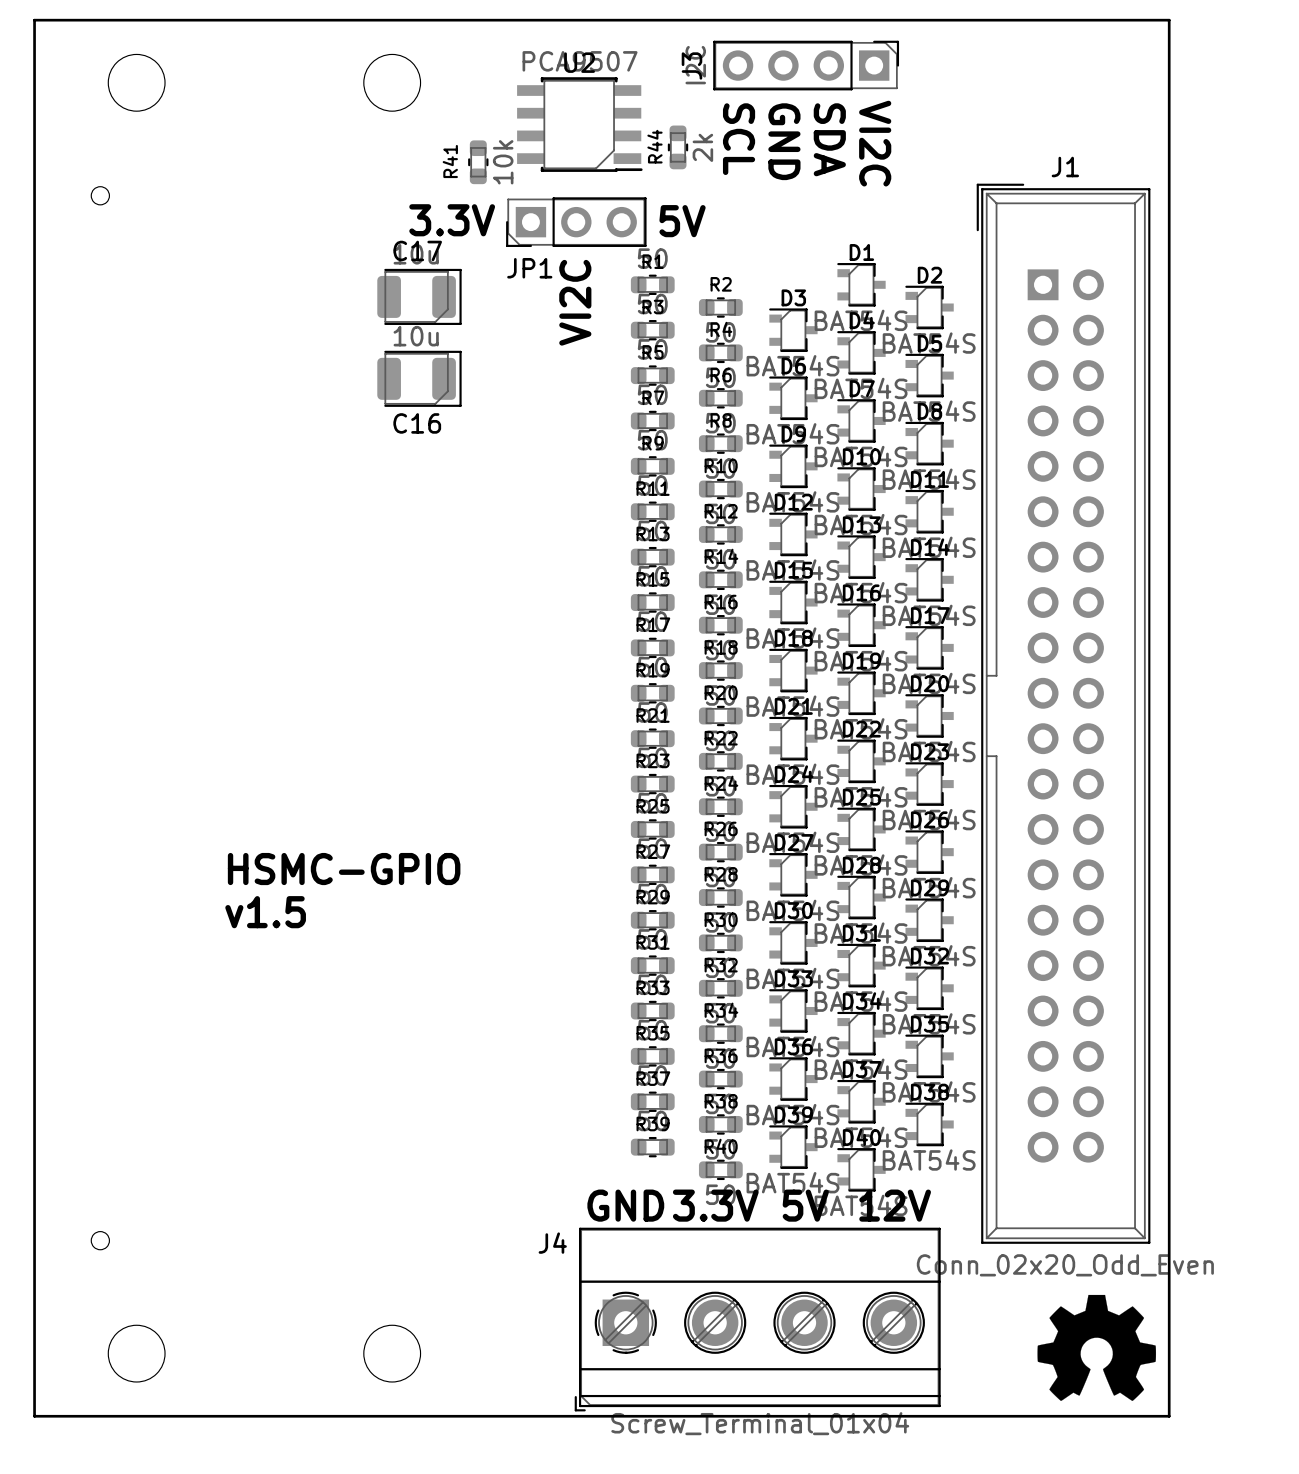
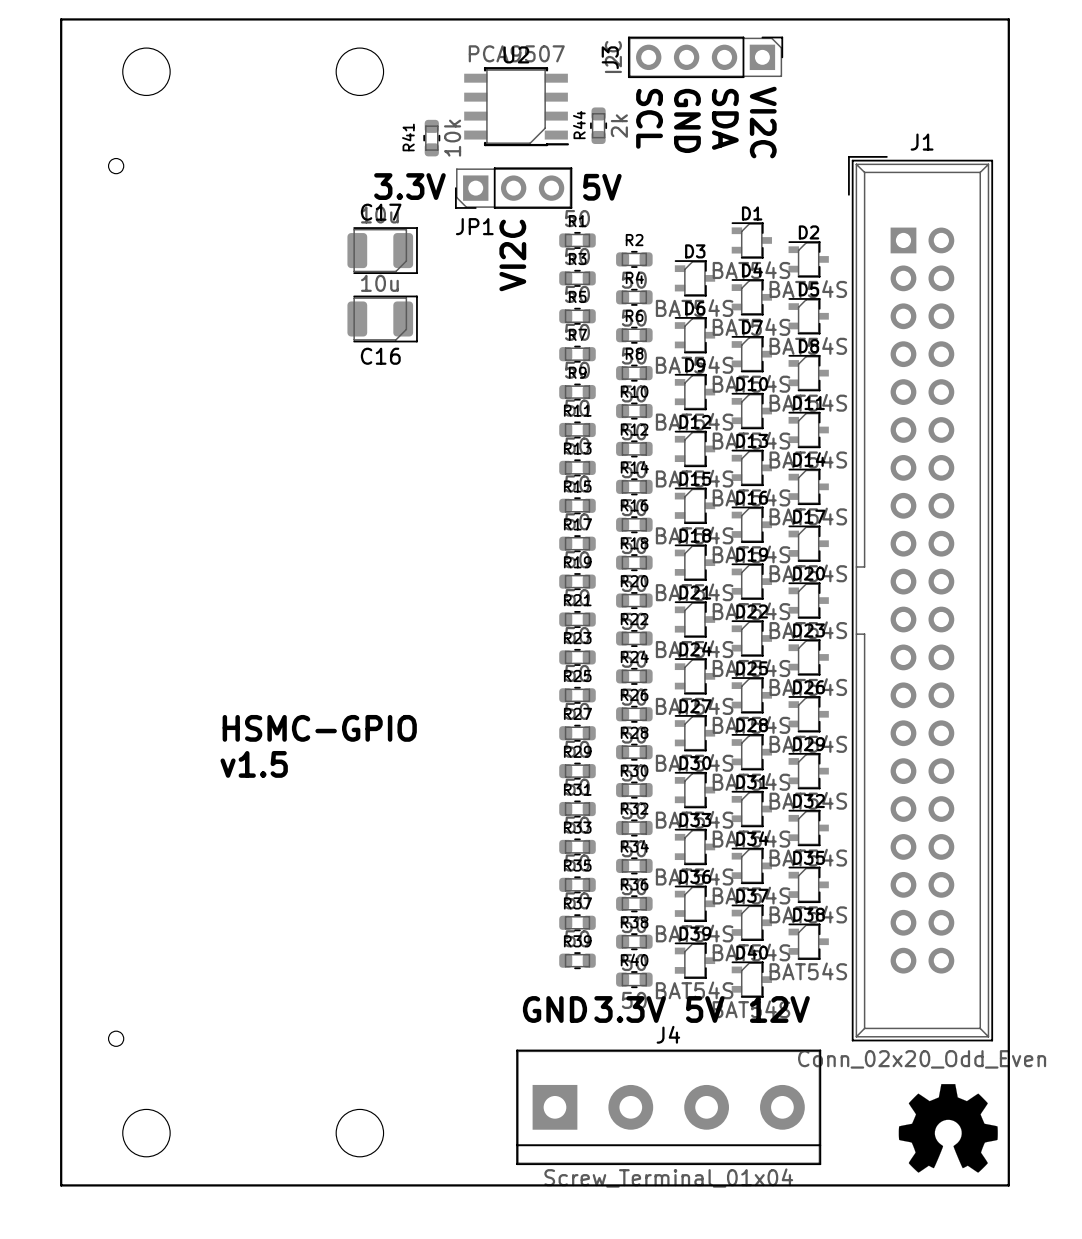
J4 footprint: [574, 1227, 941, 1412] -> [516, 1049, 822, 1166]
J4 name position: J4 (552, 1243) -> J4 (668, 1034)

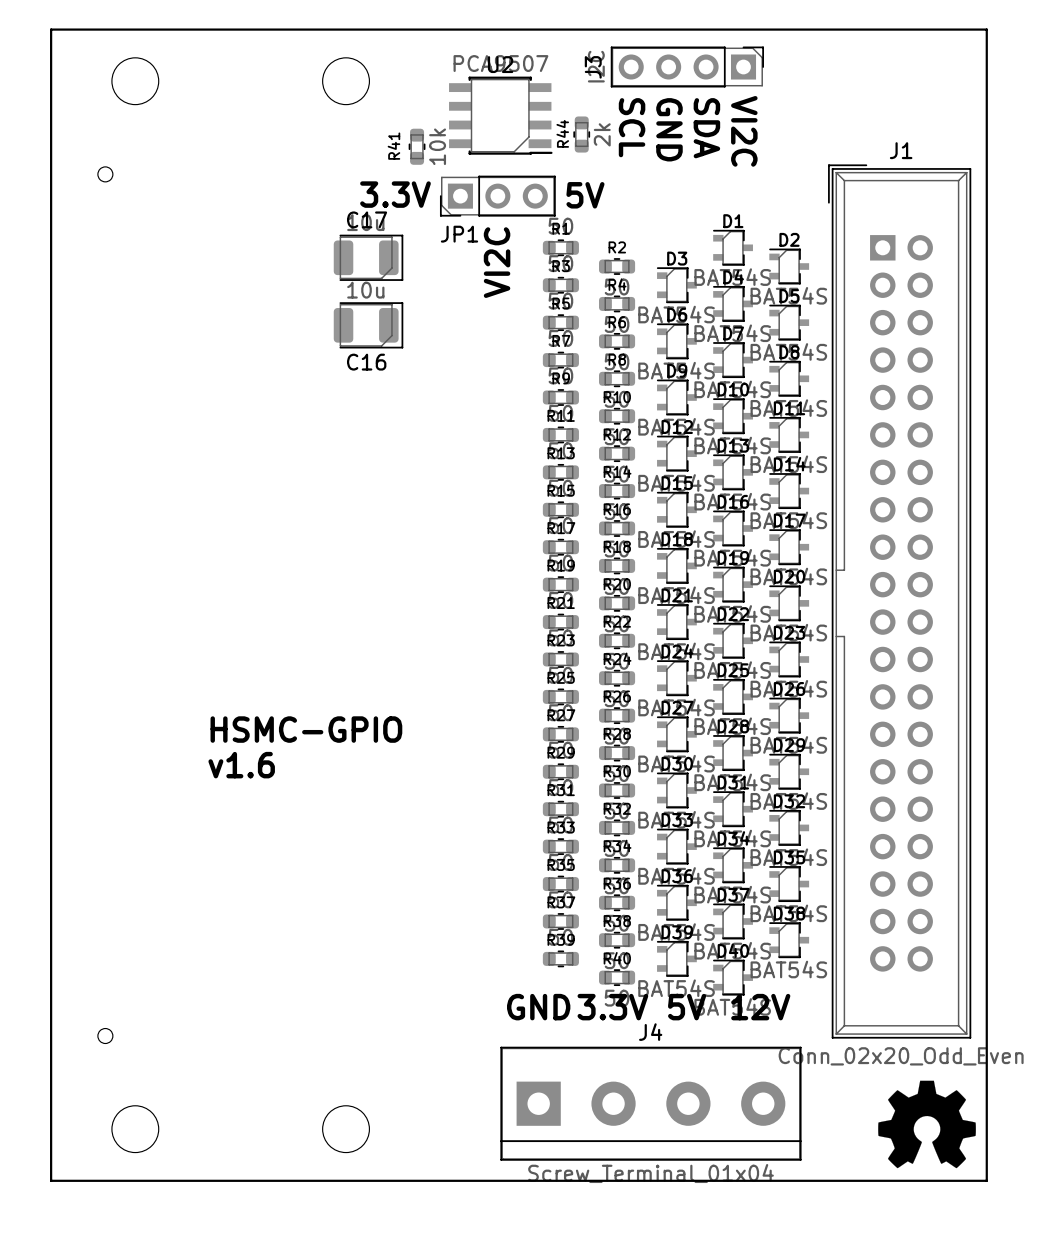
text: v1.5 (254, 764) -> v1.6 (241, 765)

